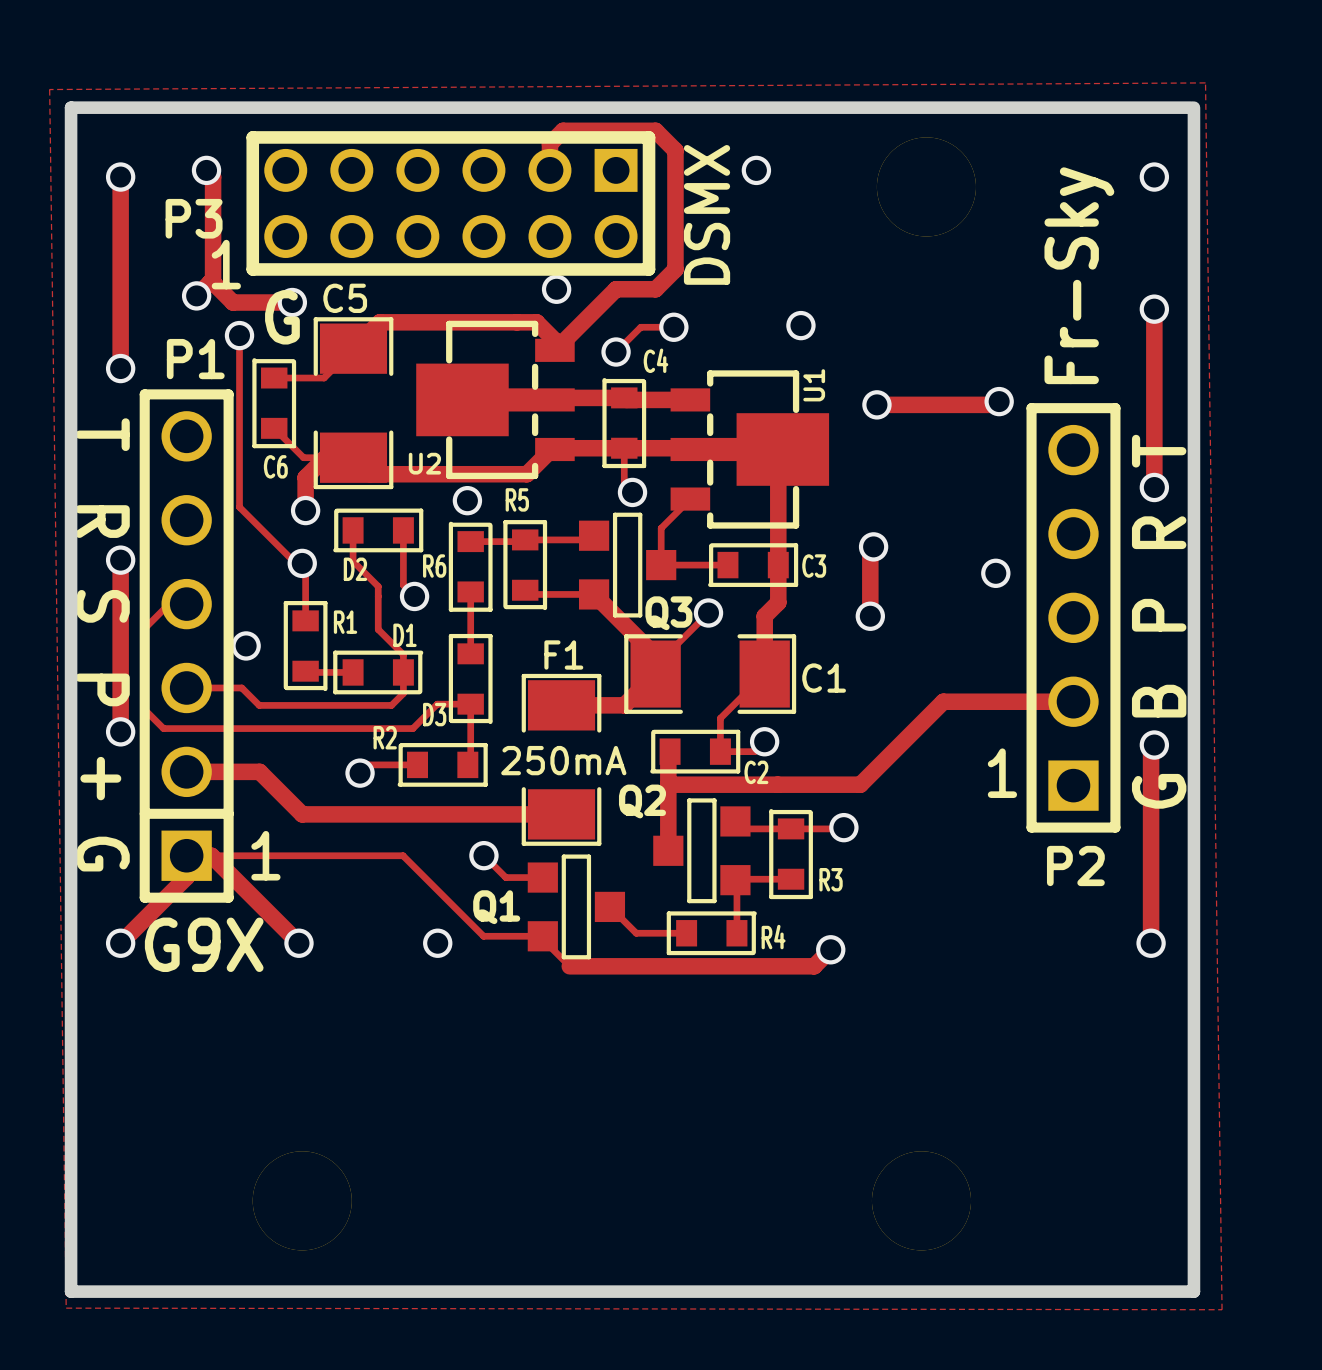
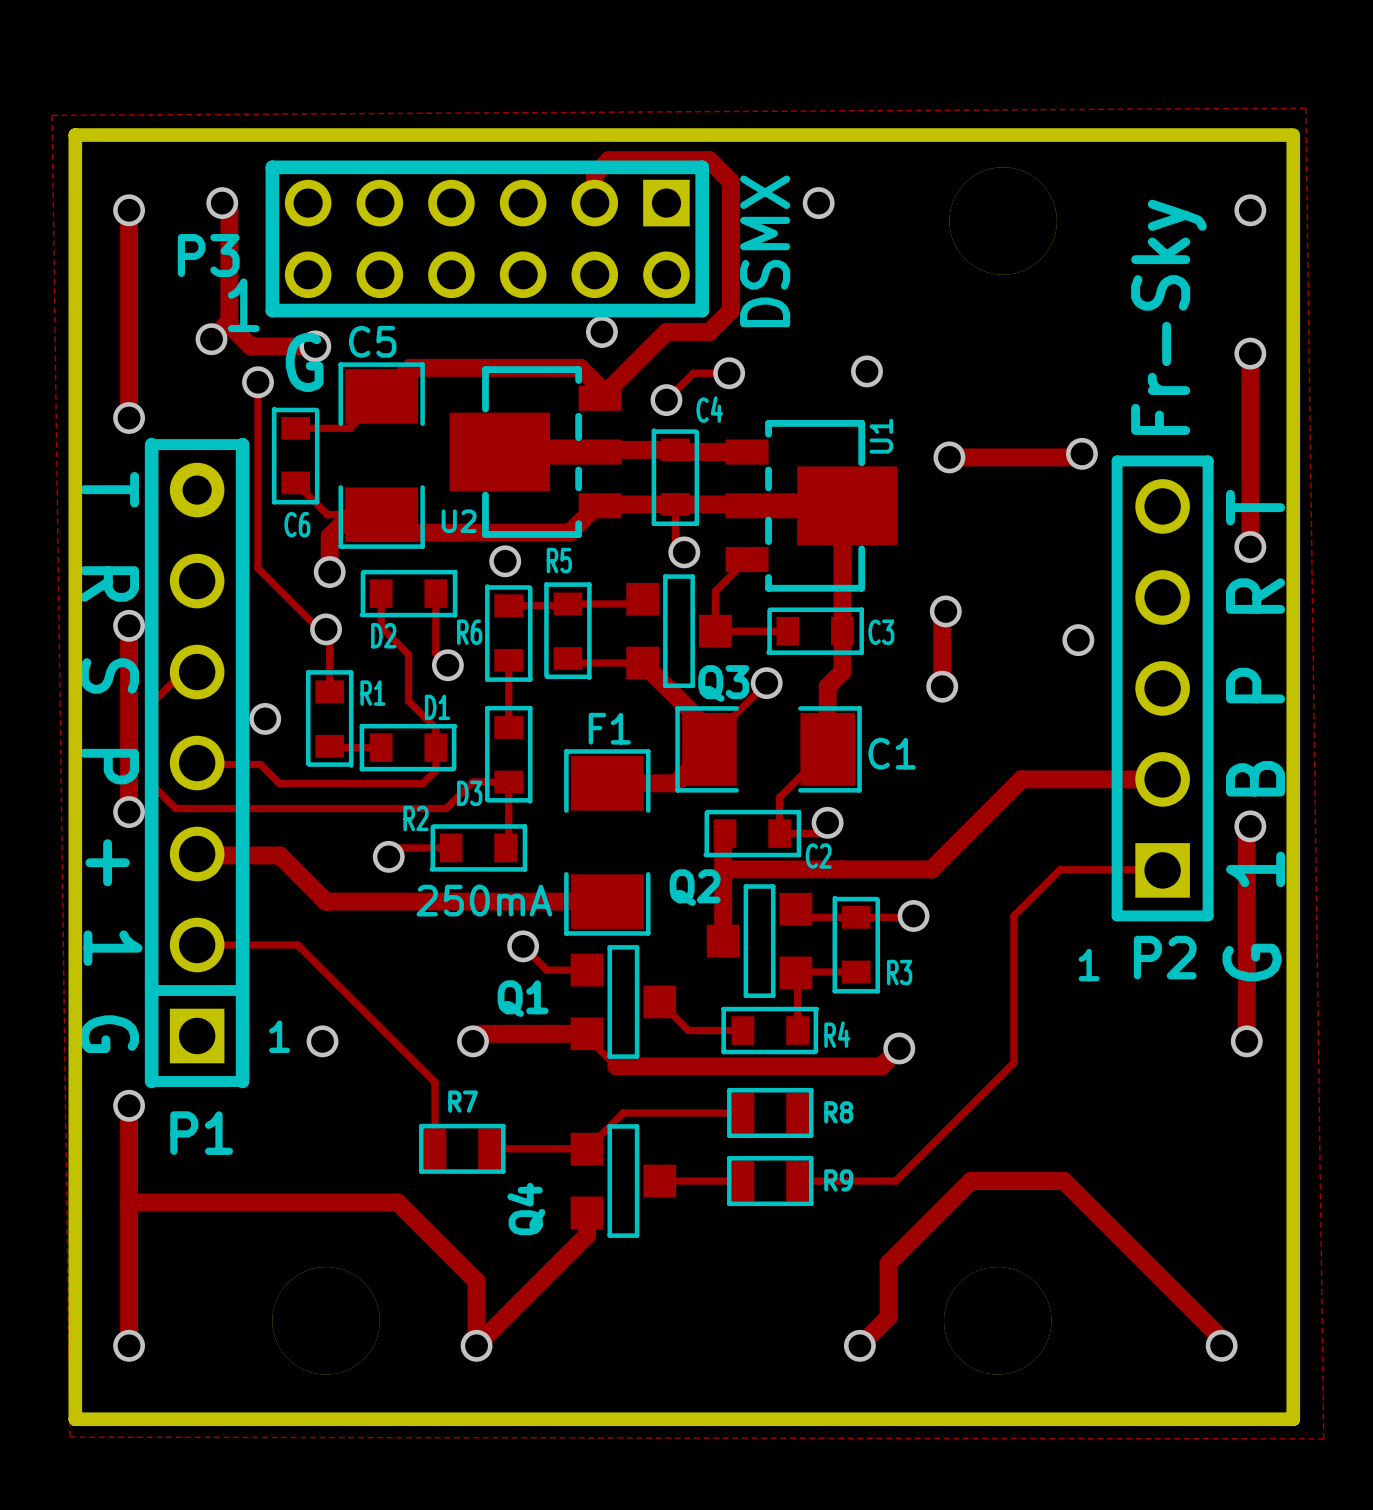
P1 name position: P1 (195, 359) -> P1 (201, 1133)
P1 footprint: [139, 389, 234, 903] -> [144, 437, 250, 1089]
F1 value position: 250mA (563, 760) -> 250mA (484, 900)
text: 1 (1002, 773) -> none
text: none -> 1 (1255, 869)
track: none -> (1164, 869) (1060, 869) (1013, 915) (1013, 1062) (895, 1181) (797, 1181)
text position: G (1159, 791) -> G (1251, 962)
text position: G (102, 854) -> G (109, 1034)
track: none -> (197, 945) (297, 945) (434, 1082) (434, 1148)
track: (186, 855) (403, 855) (483, 936) -> (473, 1041) (480, 1033) (522, 1033)
track: (186, 855) (211, 855) (298, 943) -> none
track: (186, 855) (186, 877) (120, 943) -> none
text: 1 (265, 855) -> none
text: none -> 1 (113, 948)
text: none -> 1 (1089, 965)
Q1 name position: Q1 (496, 907) -> Q1 (523, 998)
track width: thin (483, 936) (542, 936) -> thick (522, 1033) (587, 1033)
text: none -> 1 (279, 1036)
via position: (120, 943) -> (129, 1105)
P1 value: G9X (204, 944) -> none
track: none -> (129, 1105) (129, 1345)
track: none -> (742, 1112) (623, 1112) (587, 1149)
R8: none -> (770, 1112)
R7: none -> (462, 1148)
track: none -> (489, 1148) (586, 1148)
Q4: none -> (623, 1181)
track: none -> (659, 1181) (742, 1181)
R9: none -> (770, 1181)
track: none -> (129, 1202) (397, 1202) (476, 1281) (476, 1345) (587, 1235) (587, 1212)
via: none -> (129, 1345)
via: none -> (476, 1345)
track: none -> (859, 1345) (888, 1317) (888, 1263) (970, 1181) (1063, 1181) (1221, 1338) (1221, 1345)
via: none -> (859, 1345)
via: none -> (1221, 1345)

